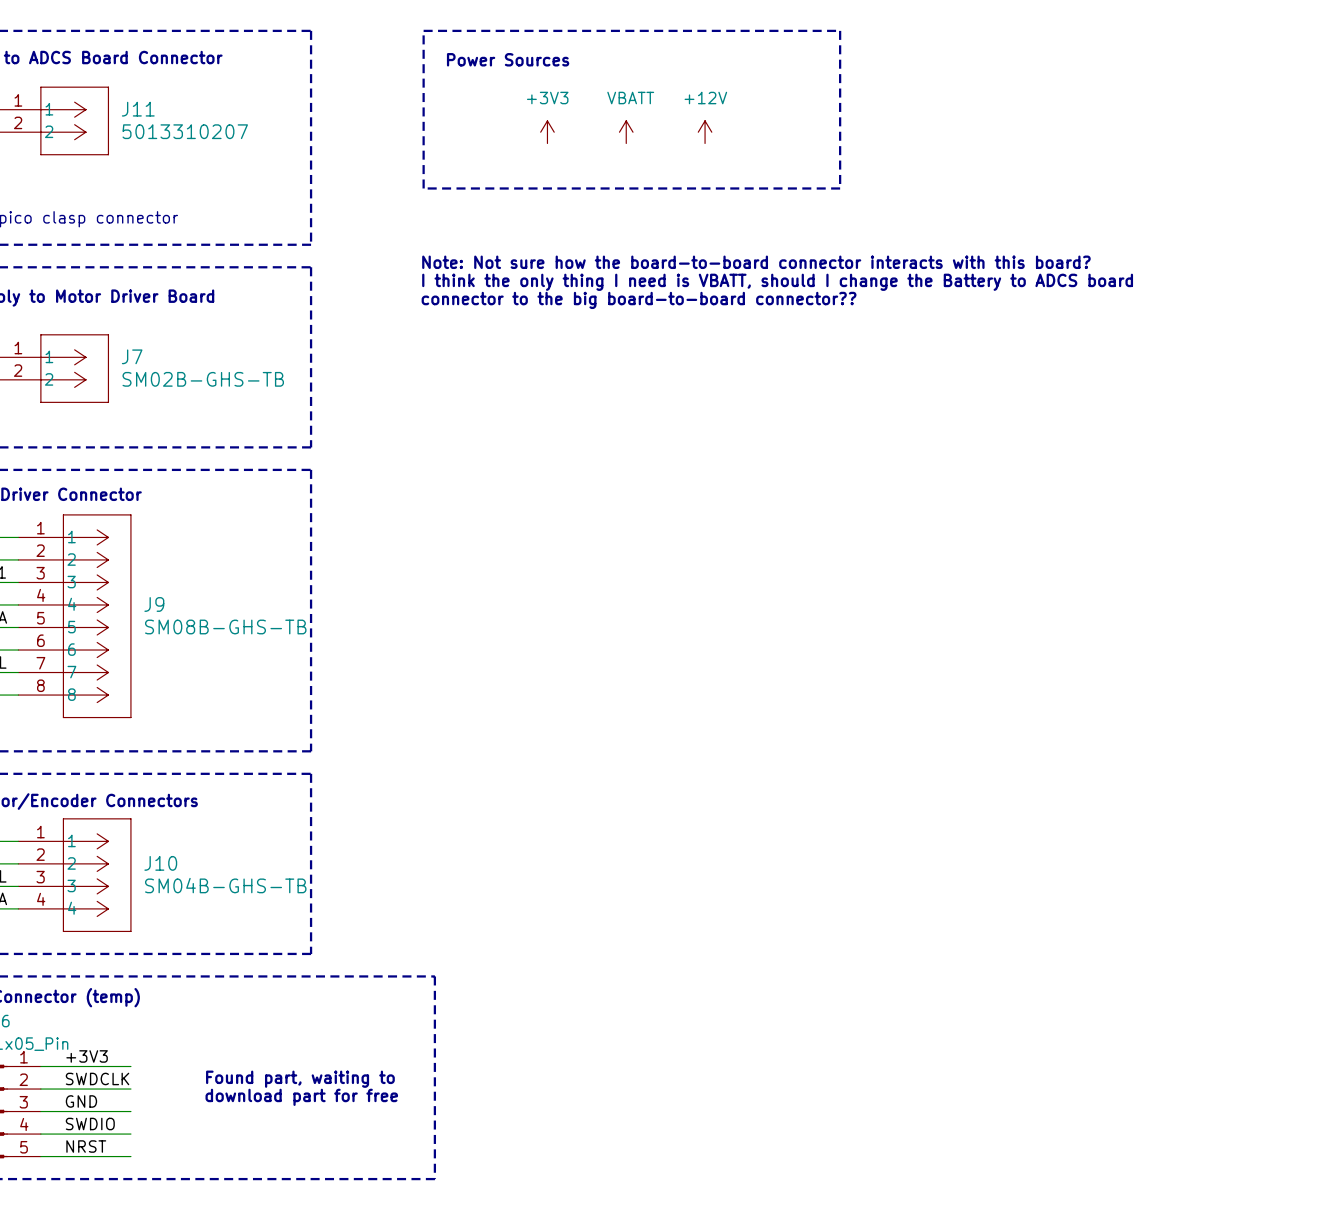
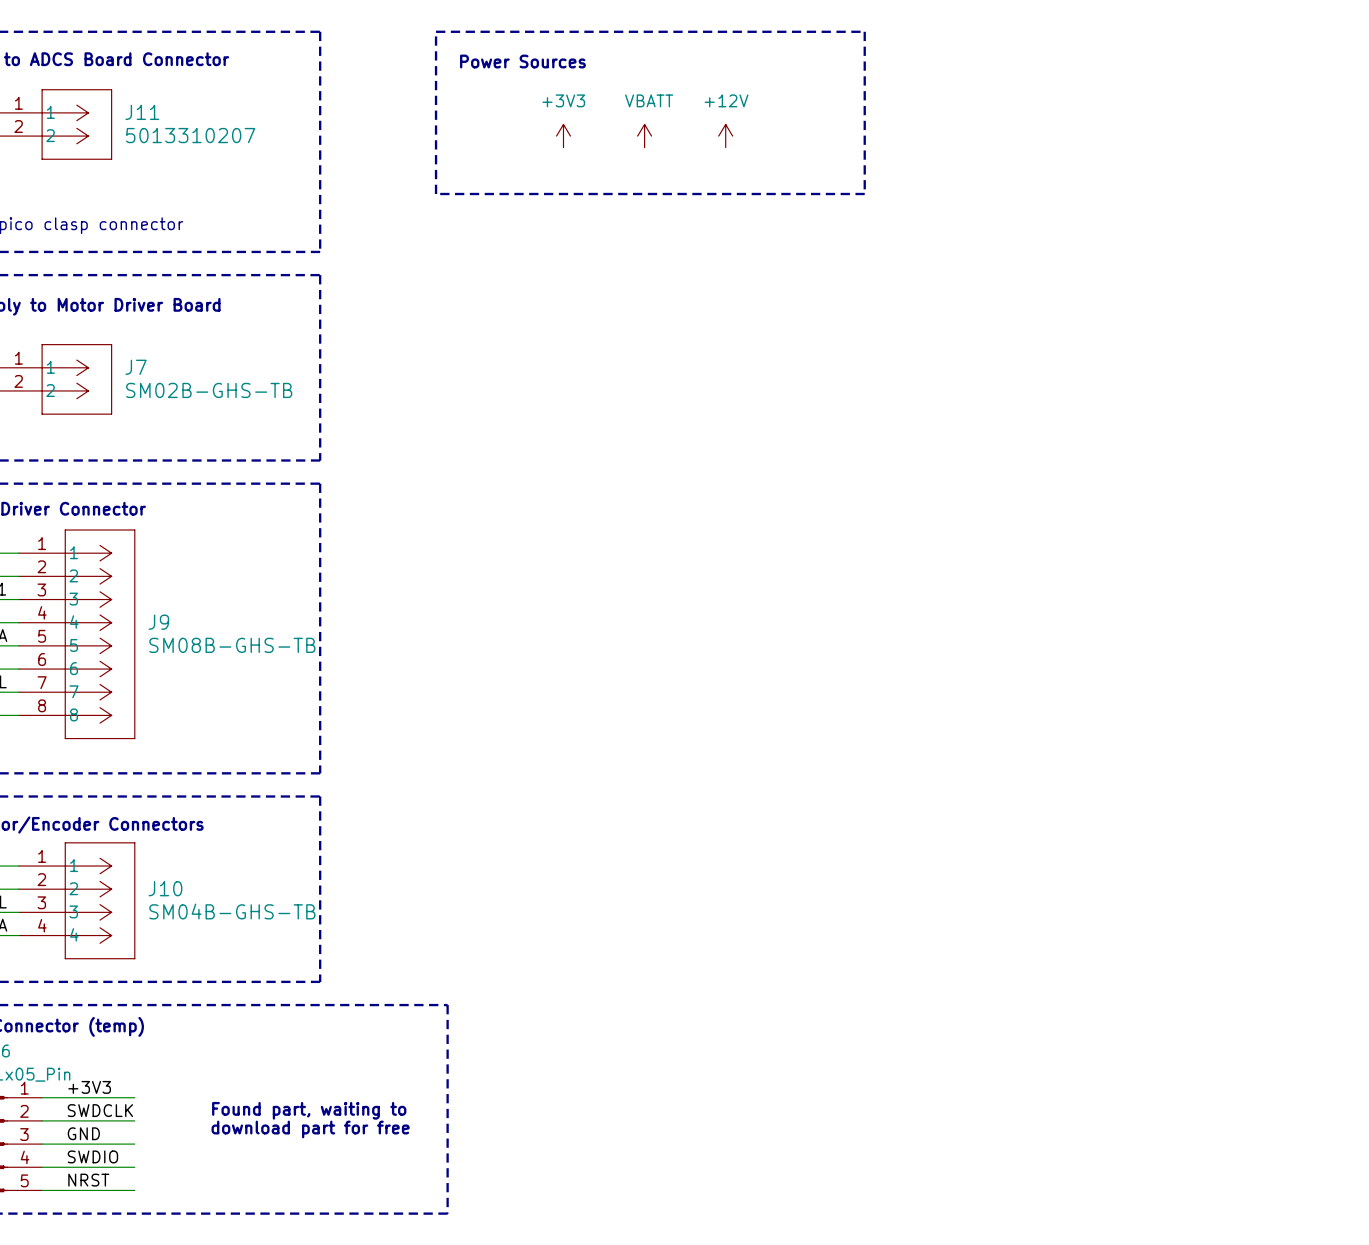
text: Note: Not sure how the board-to-board connector interacts with this board? (756, 262) -> none
text: I think the only thing I need is VBATT, should I change the Battery to ADCS board (777, 282) -> none
text: connector to the big board-to-board connector?? (639, 300) -> none

